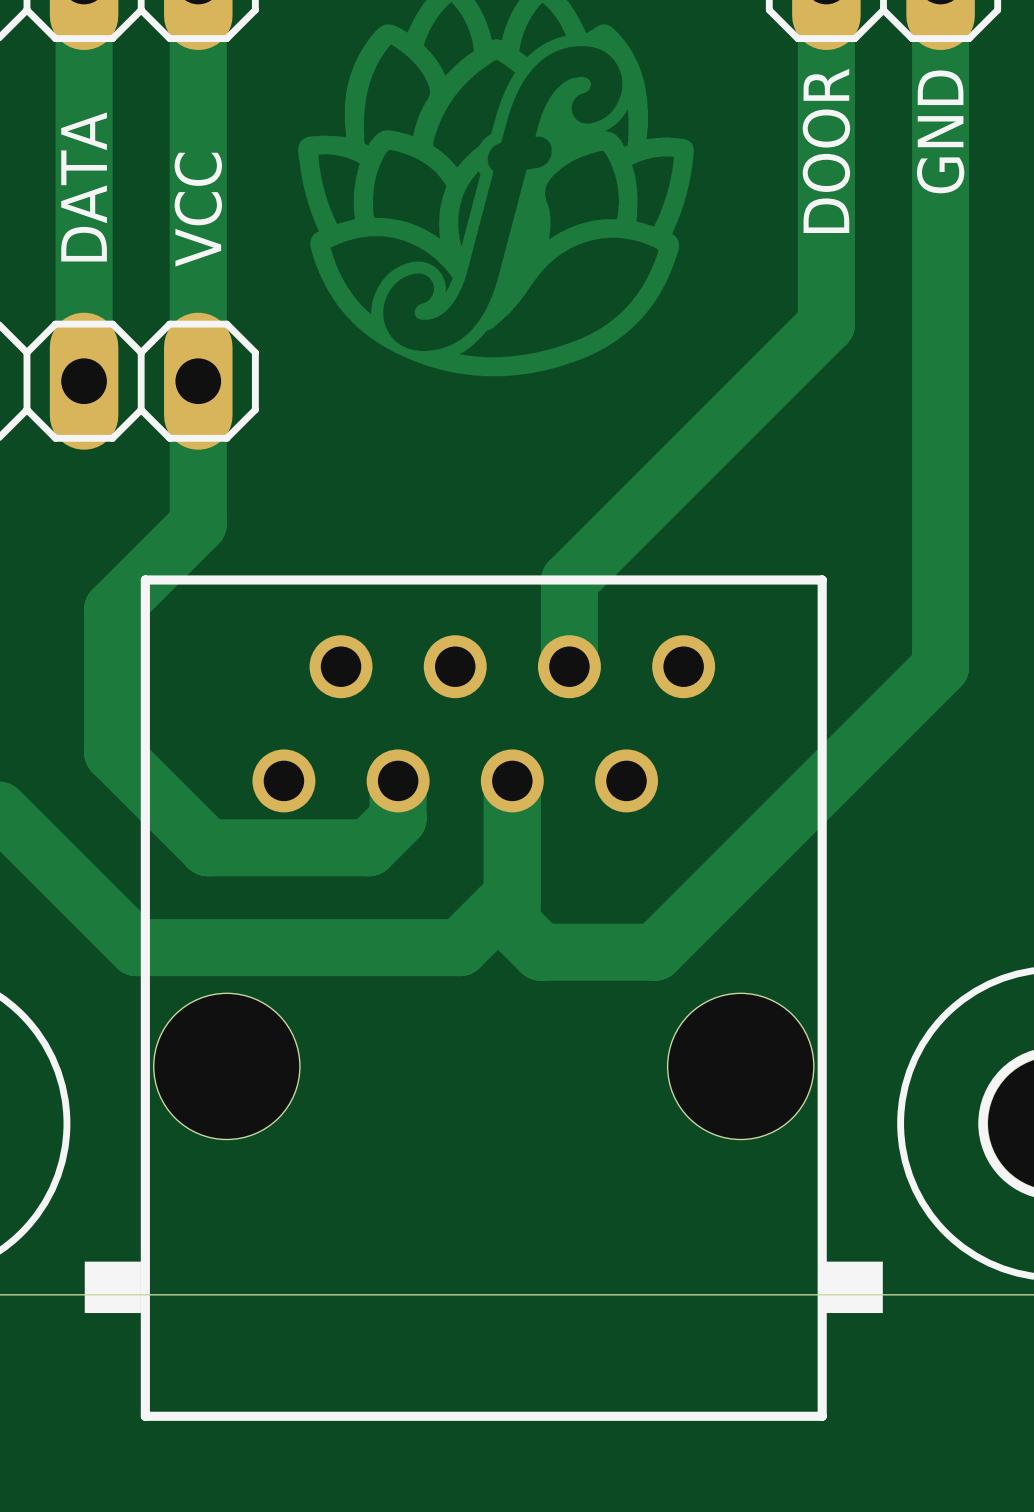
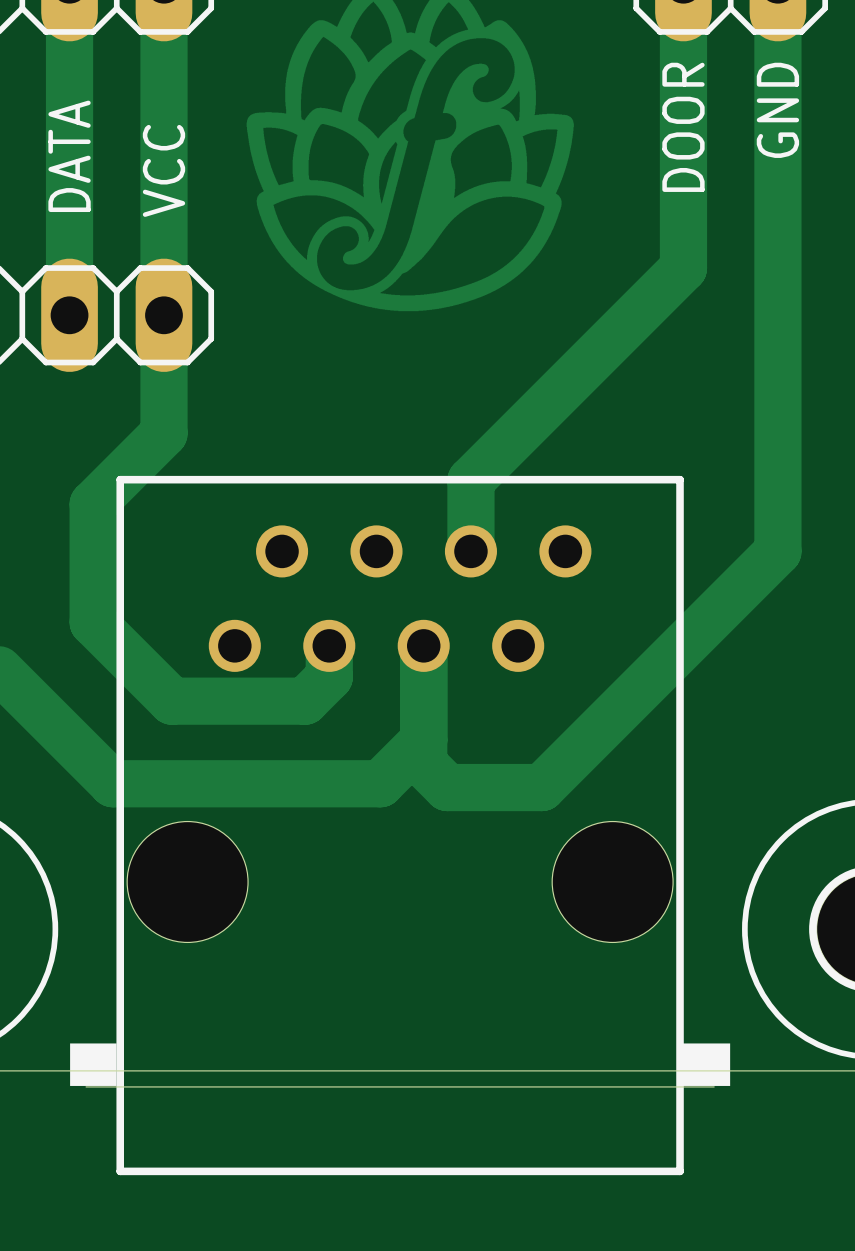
part footprint: [84, 575, 883, 1421] -> [70, 475, 731, 1176]

